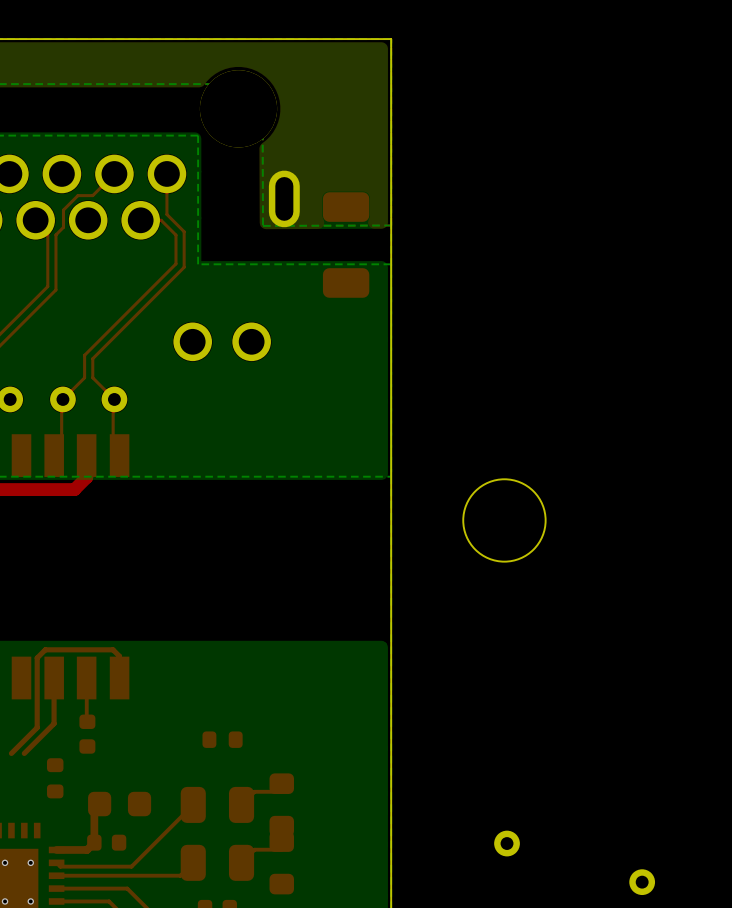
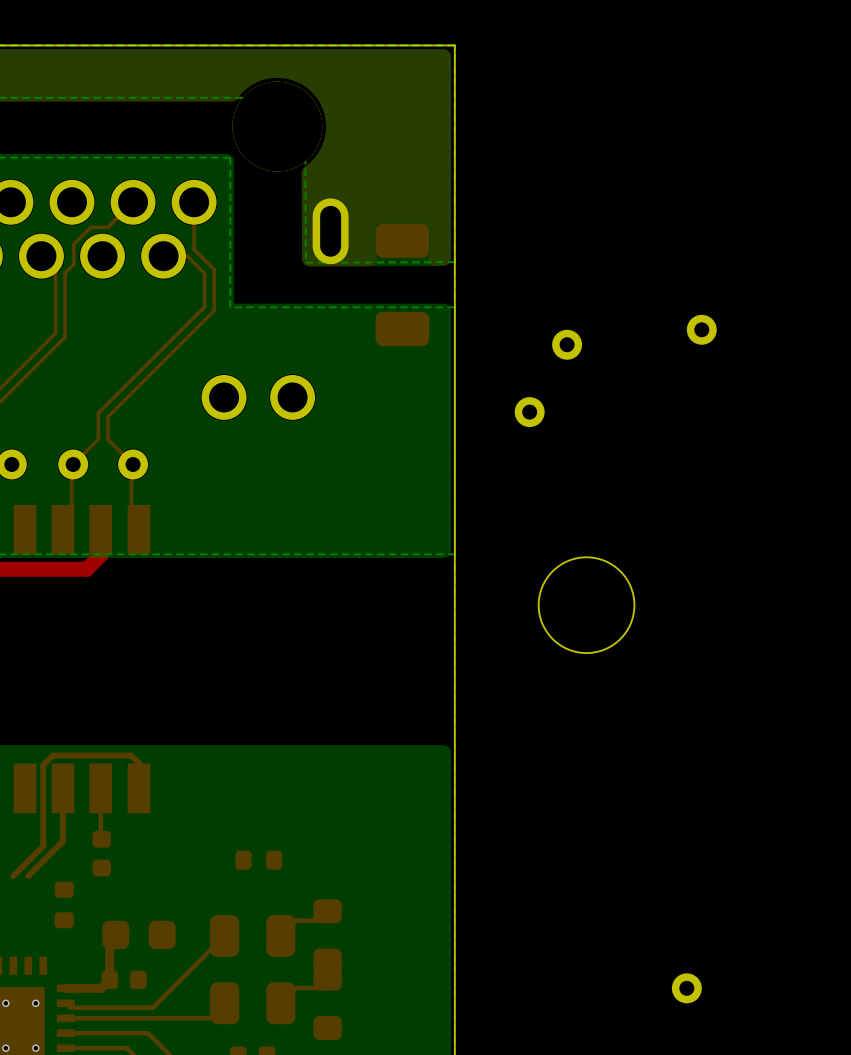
part: none -> (701, 329)
part: none -> (567, 344)
part: none -> (529, 412)
part: (507, 843) -> none
part: none -> (686, 988)
part: (642, 882) -> none

